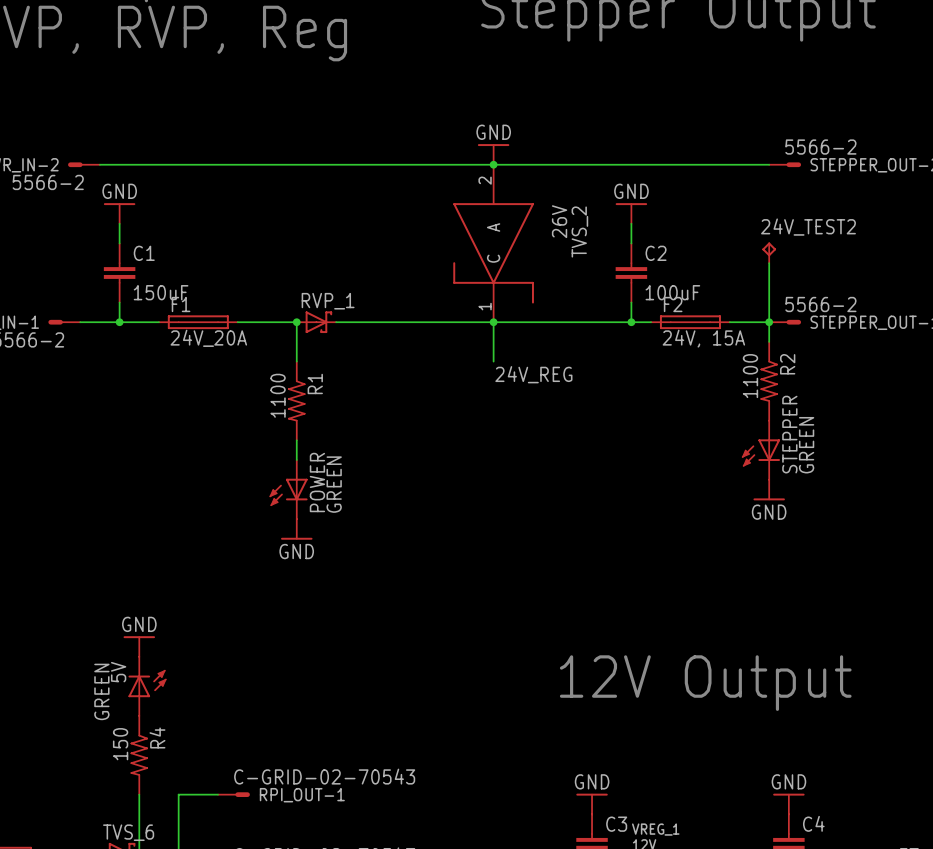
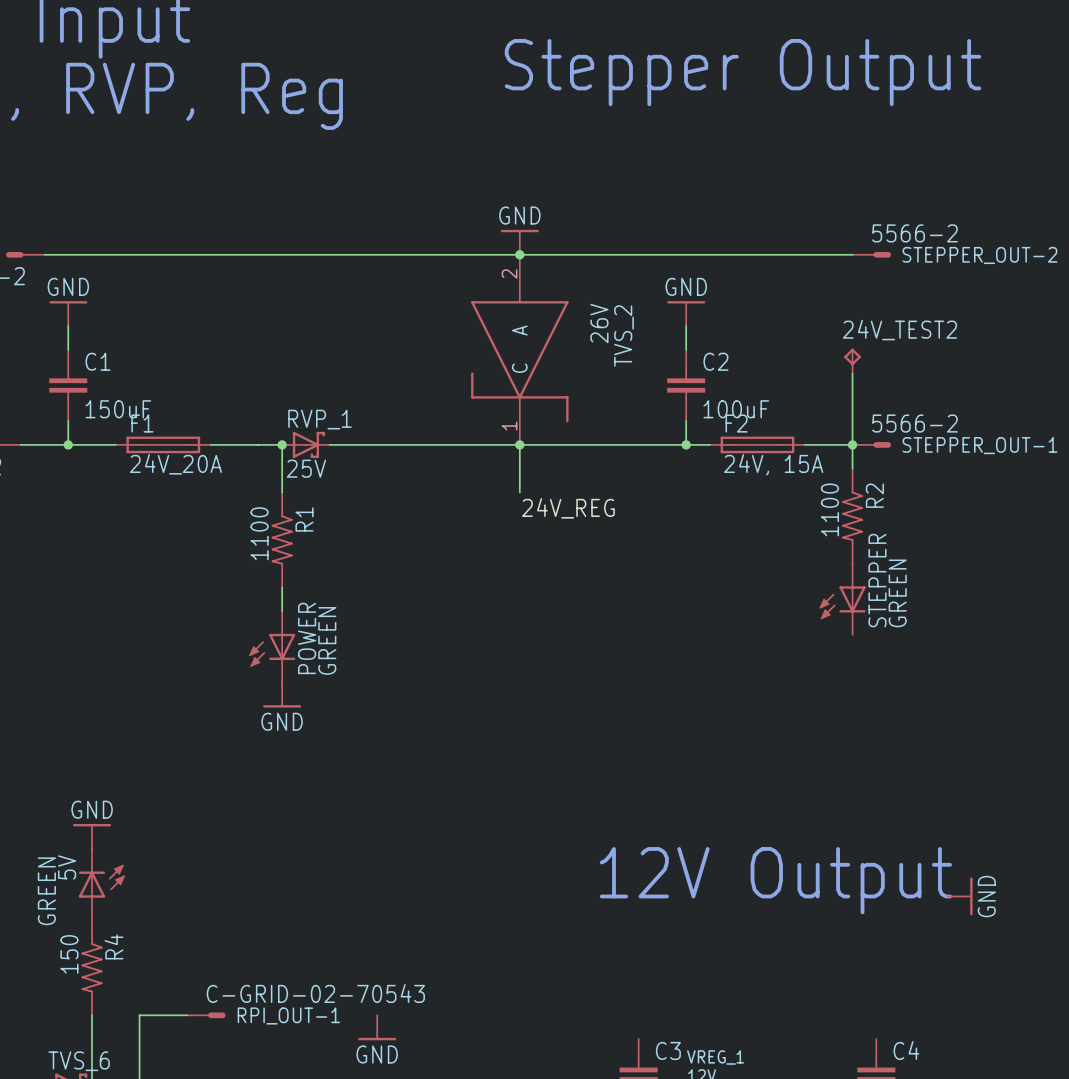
RVP_1 value: none -> 25V (306, 468)
power symbol: GND (769, 490) -> none
power symbol: none -> GND (960, 896)
power symbol: GND (592, 803) -> none
power symbol: GND (788, 803) -> none
power symbol: none -> GND (377, 1027)

